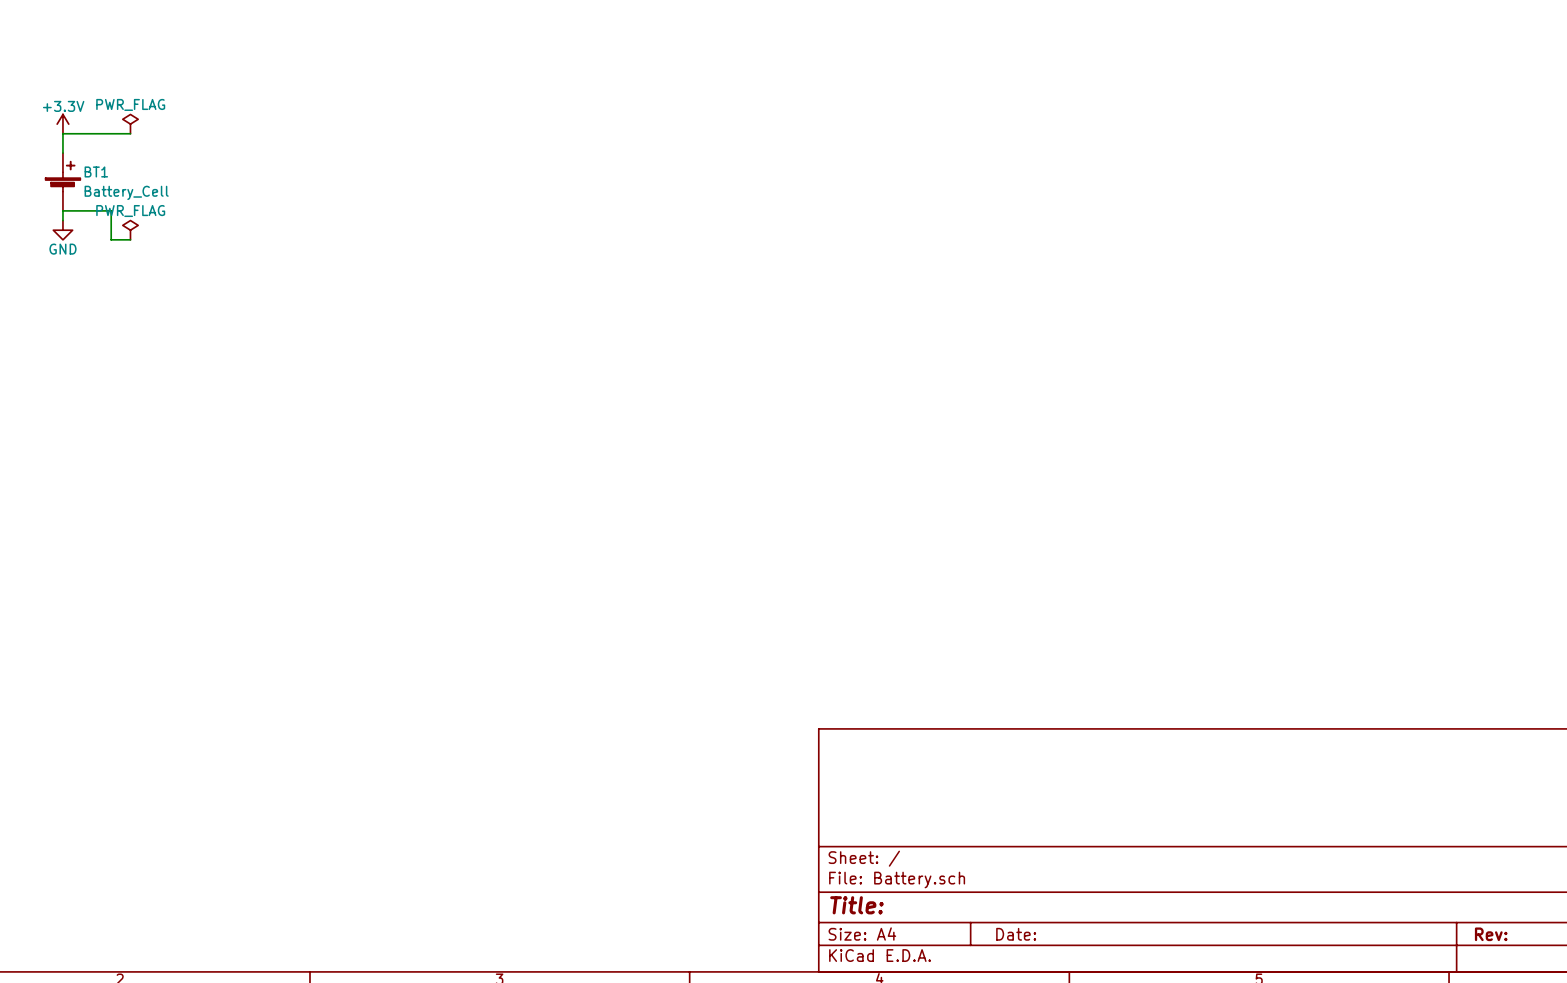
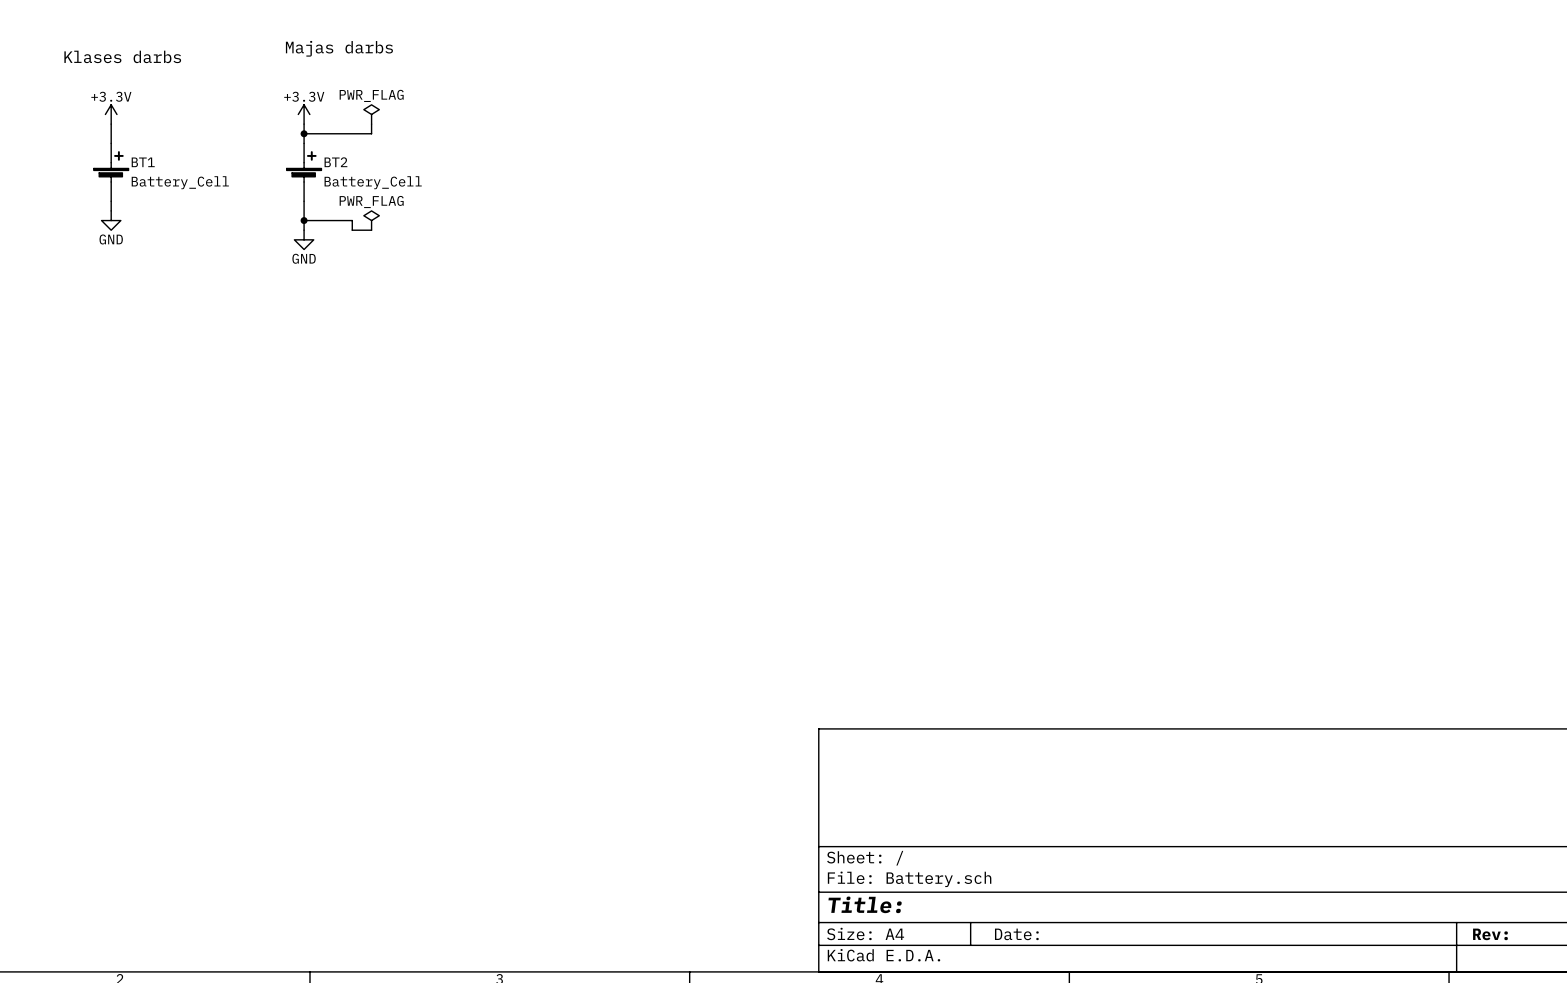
text: none -> Majas darbs (339, 48)
text: none -> Klases darbs (122, 56)
power symbol: none -> +3.3V (304, 114)
power symbol: none -> PWR_FLAG (371, 114)
power symbol position: +3.3V (62, 124) -> +3.3V (111, 114)
wire: none -> (111, 124) (111, 143)
power symbol: PWR_FLAG (130, 124) -> none
wire: none -> (304, 124) (304, 143)
wire: none -> (371, 124) (371, 133) (304, 133)
wire: (130, 133) (62, 133) (62, 153) -> none
junction: none -> (304, 133)
BT2: none -> Battery_Cell (304, 172)
BT1 position: (62, 181) -> (111, 172)
wire: none -> (111, 201) (111, 210)
wire: none -> (304, 201) (304, 230)
wire: (62, 220) (62, 210) (111, 210) (111, 239) (130, 239) -> none
wire: none -> (304, 220) (352, 220) (352, 230) (371, 230)
junction: none -> (304, 220)
power symbol: none -> PWR_FLAG (371, 220)
power symbol position: GND (62, 230) -> GND (111, 220)
power symbol: PWR_FLAG (130, 230) -> none
power symbol: none -> GND (304, 239)

